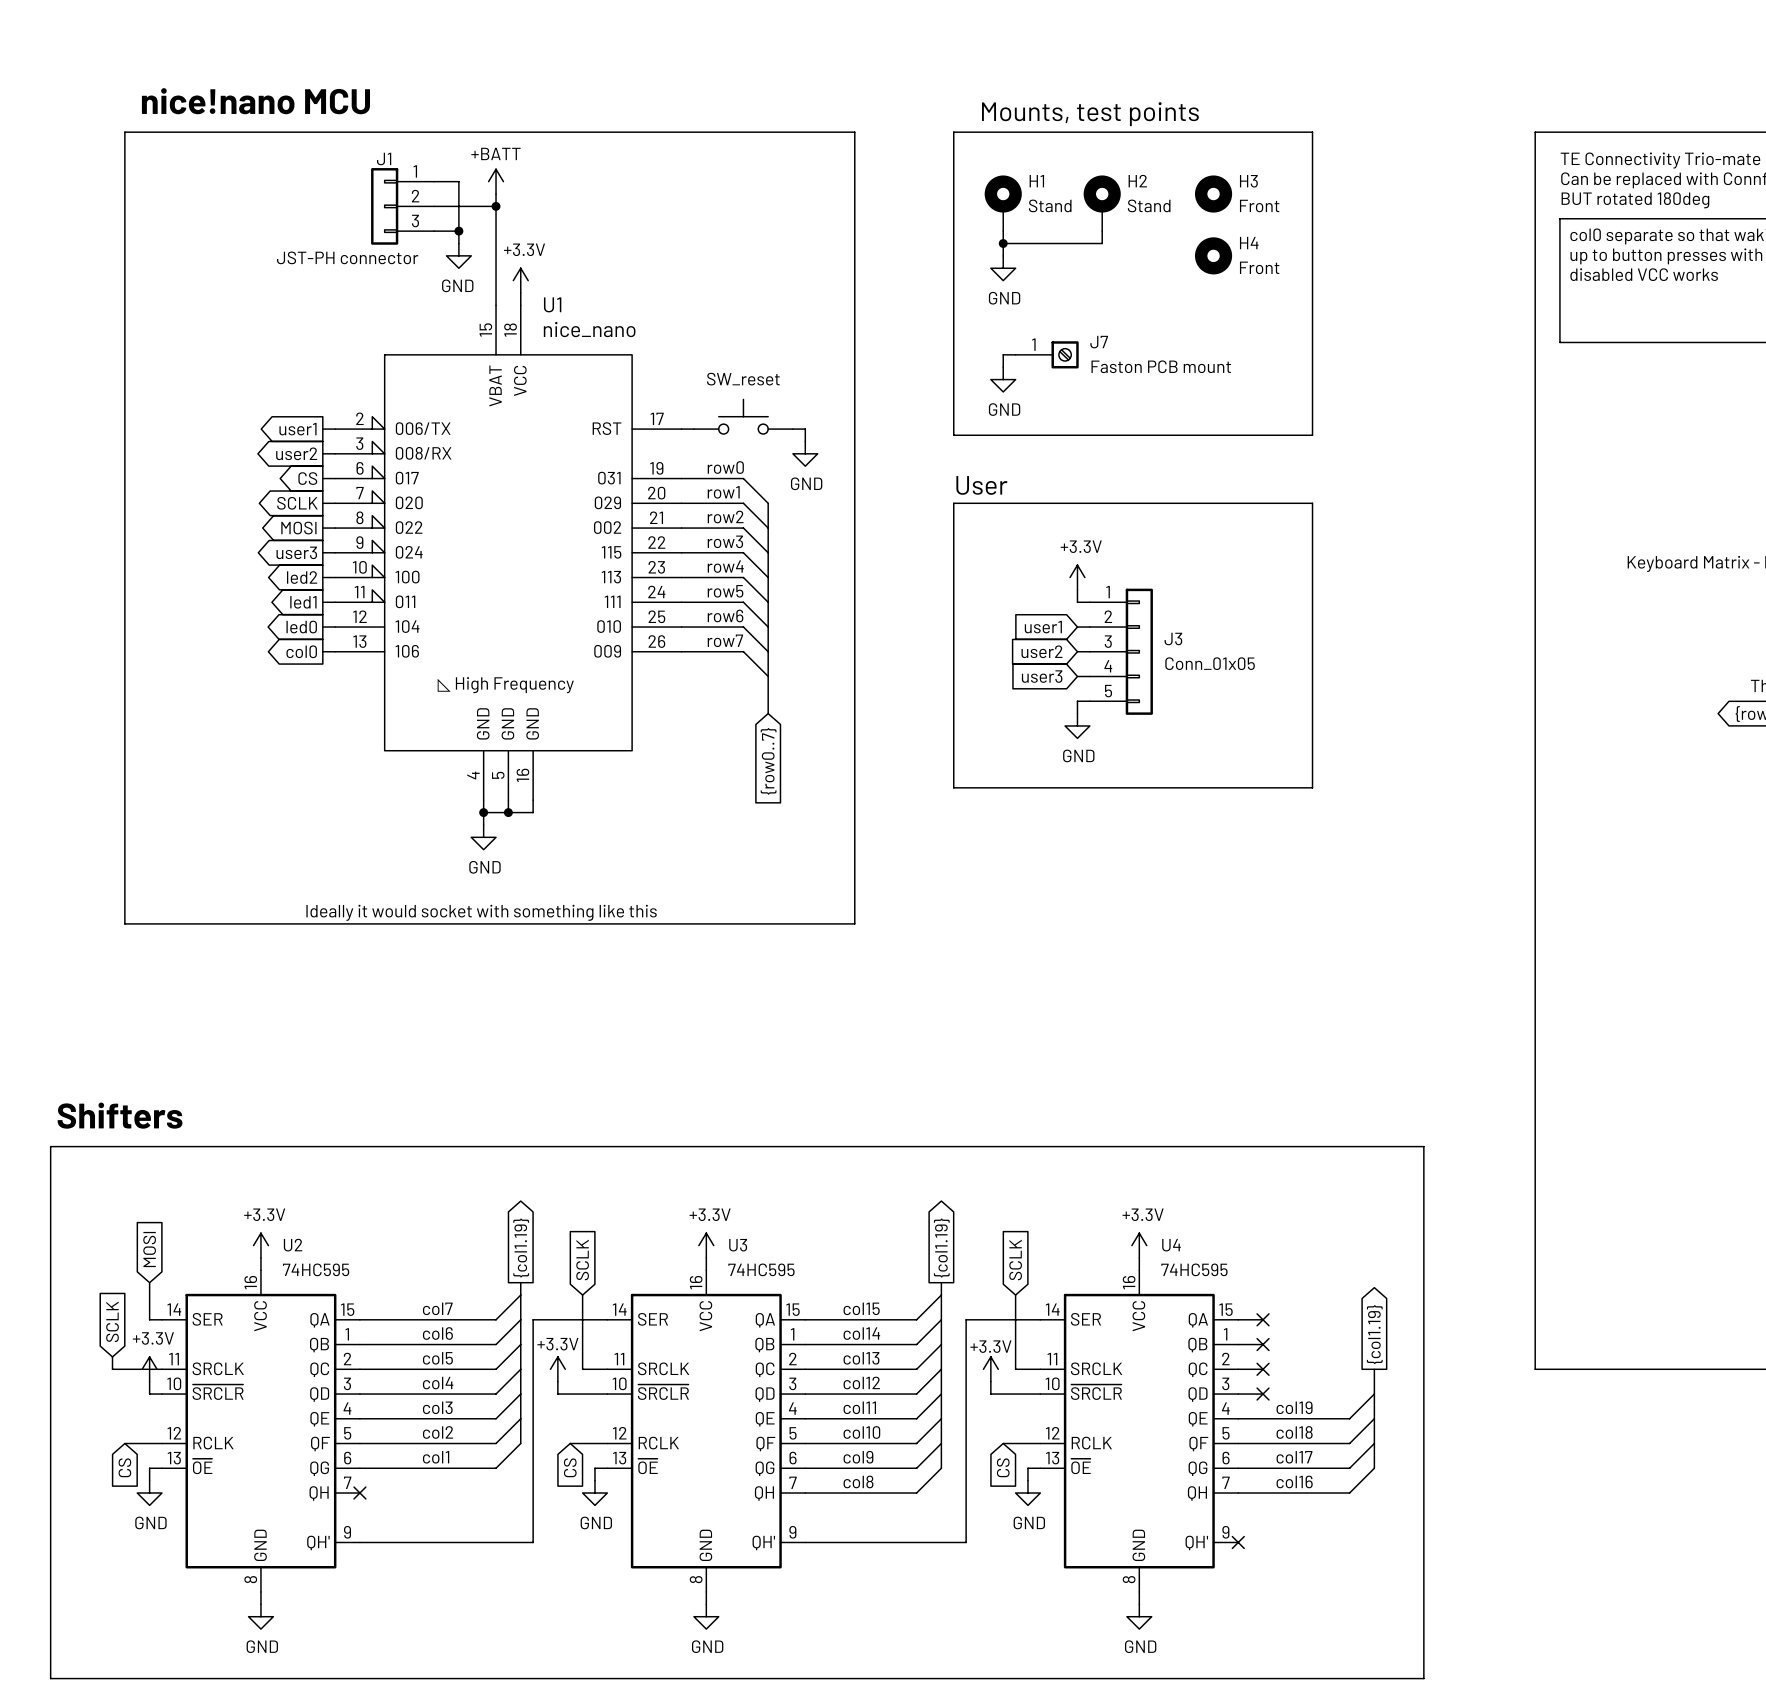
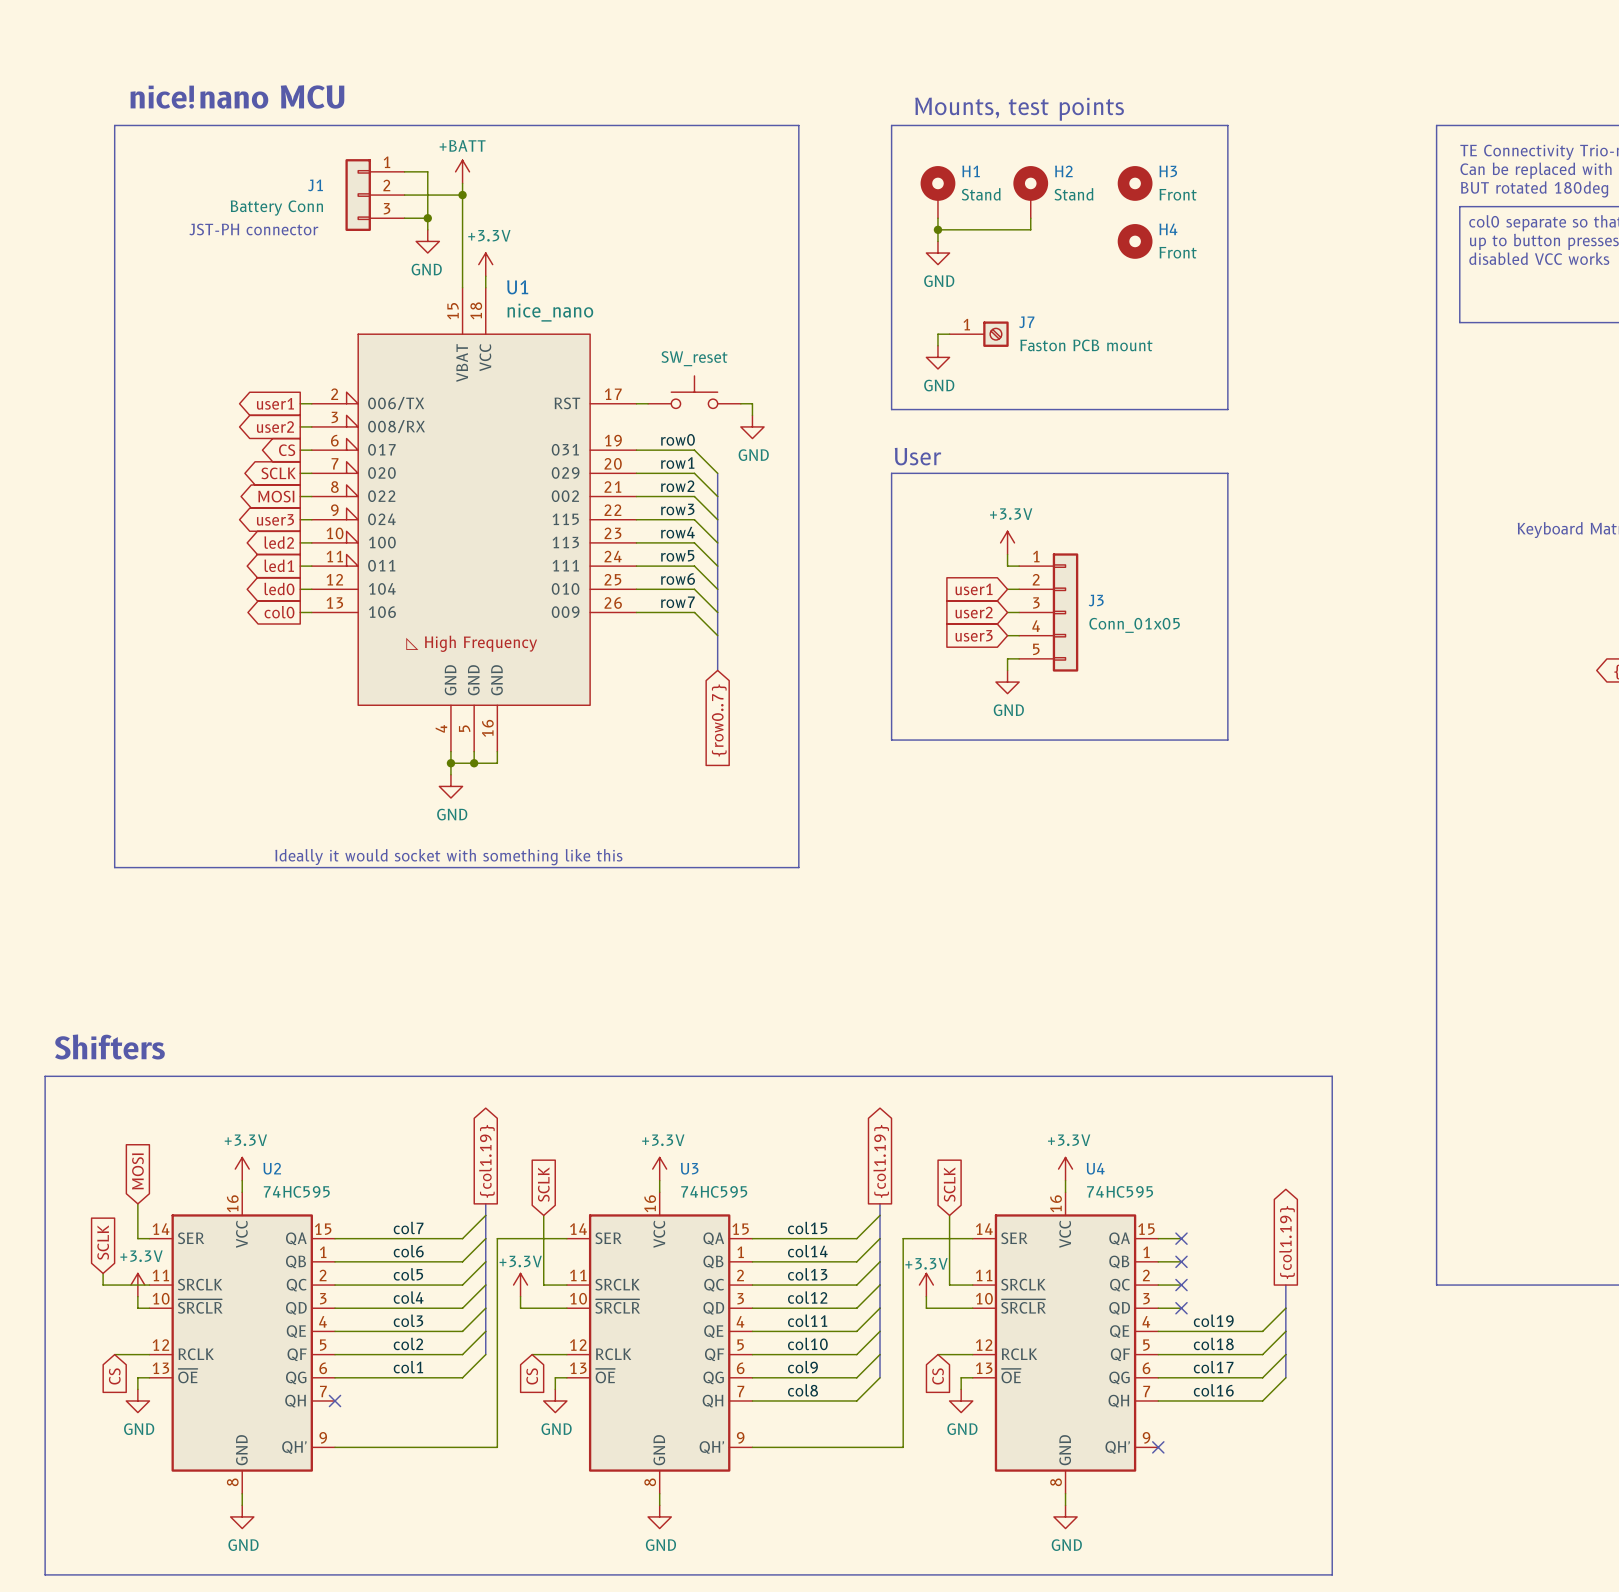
J1 name position: J1 (384, 158) -> J1 (315, 185)
text: none -> JST-PH connector (253, 229)
J1 value: JST-PH connector (347, 257) -> Battery Conn (276, 208)

